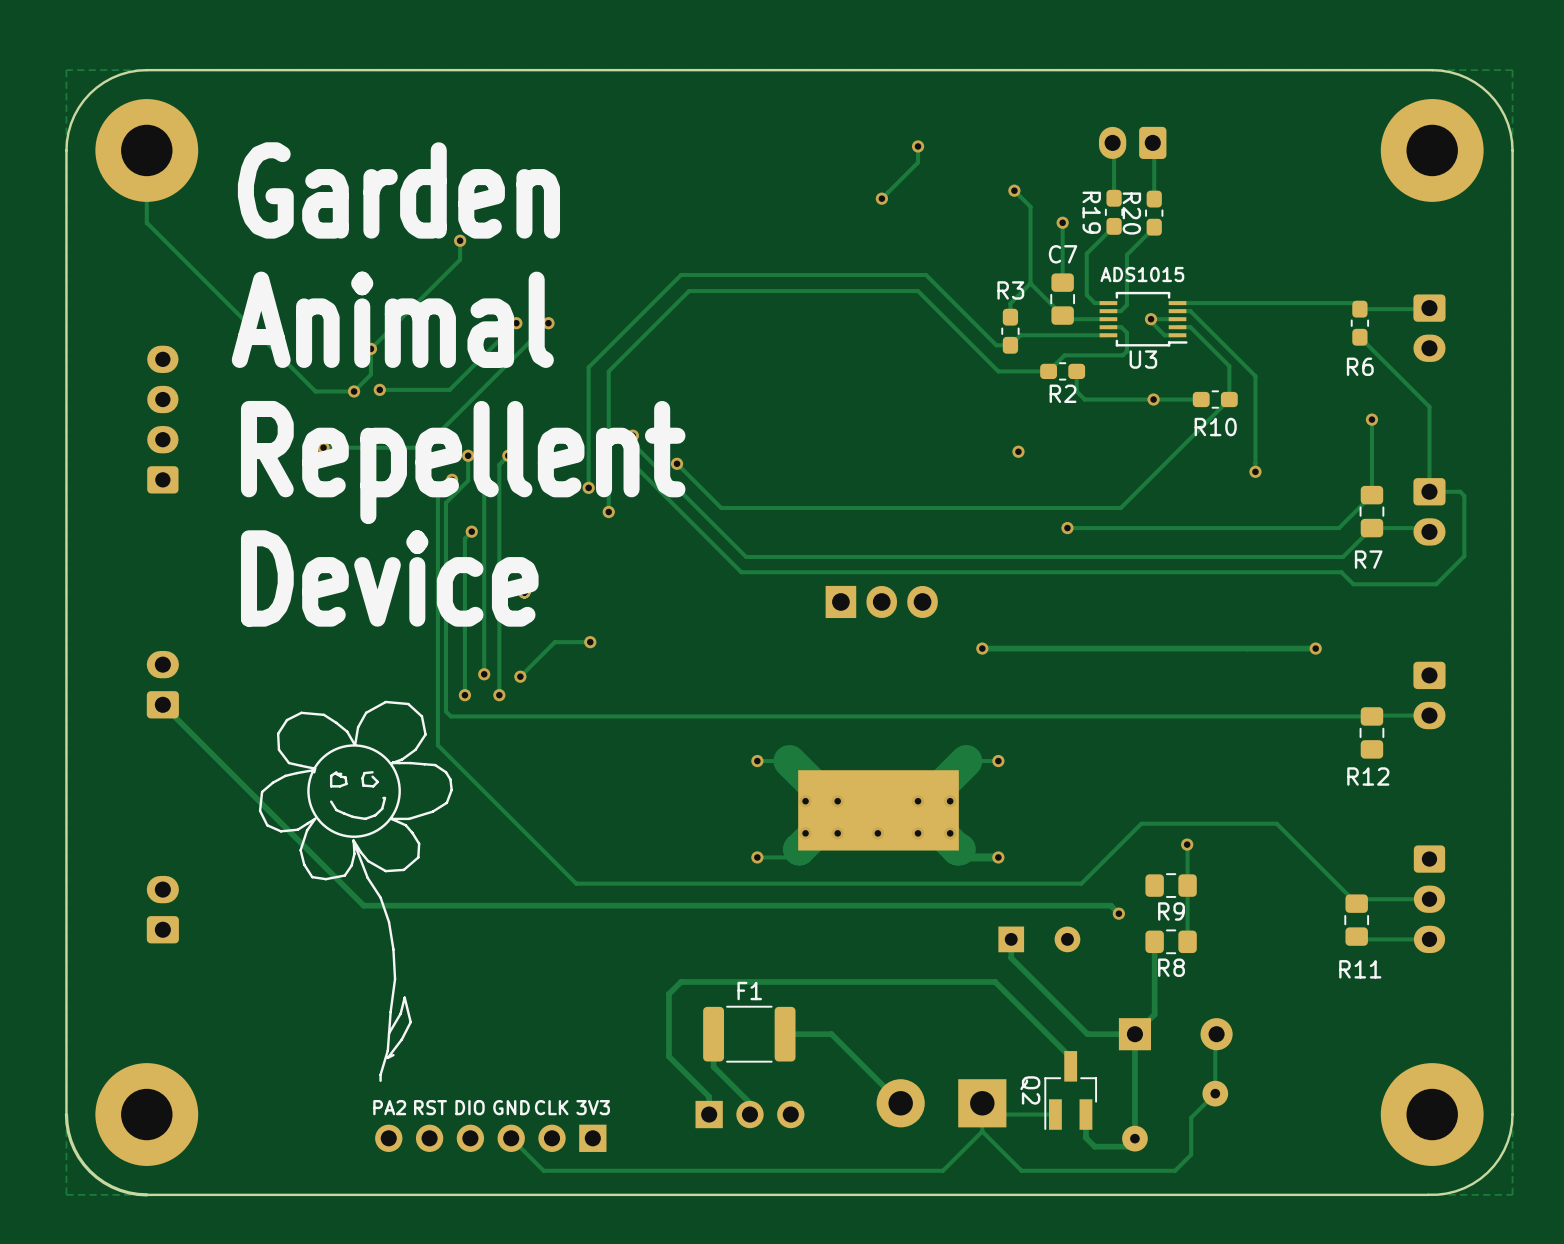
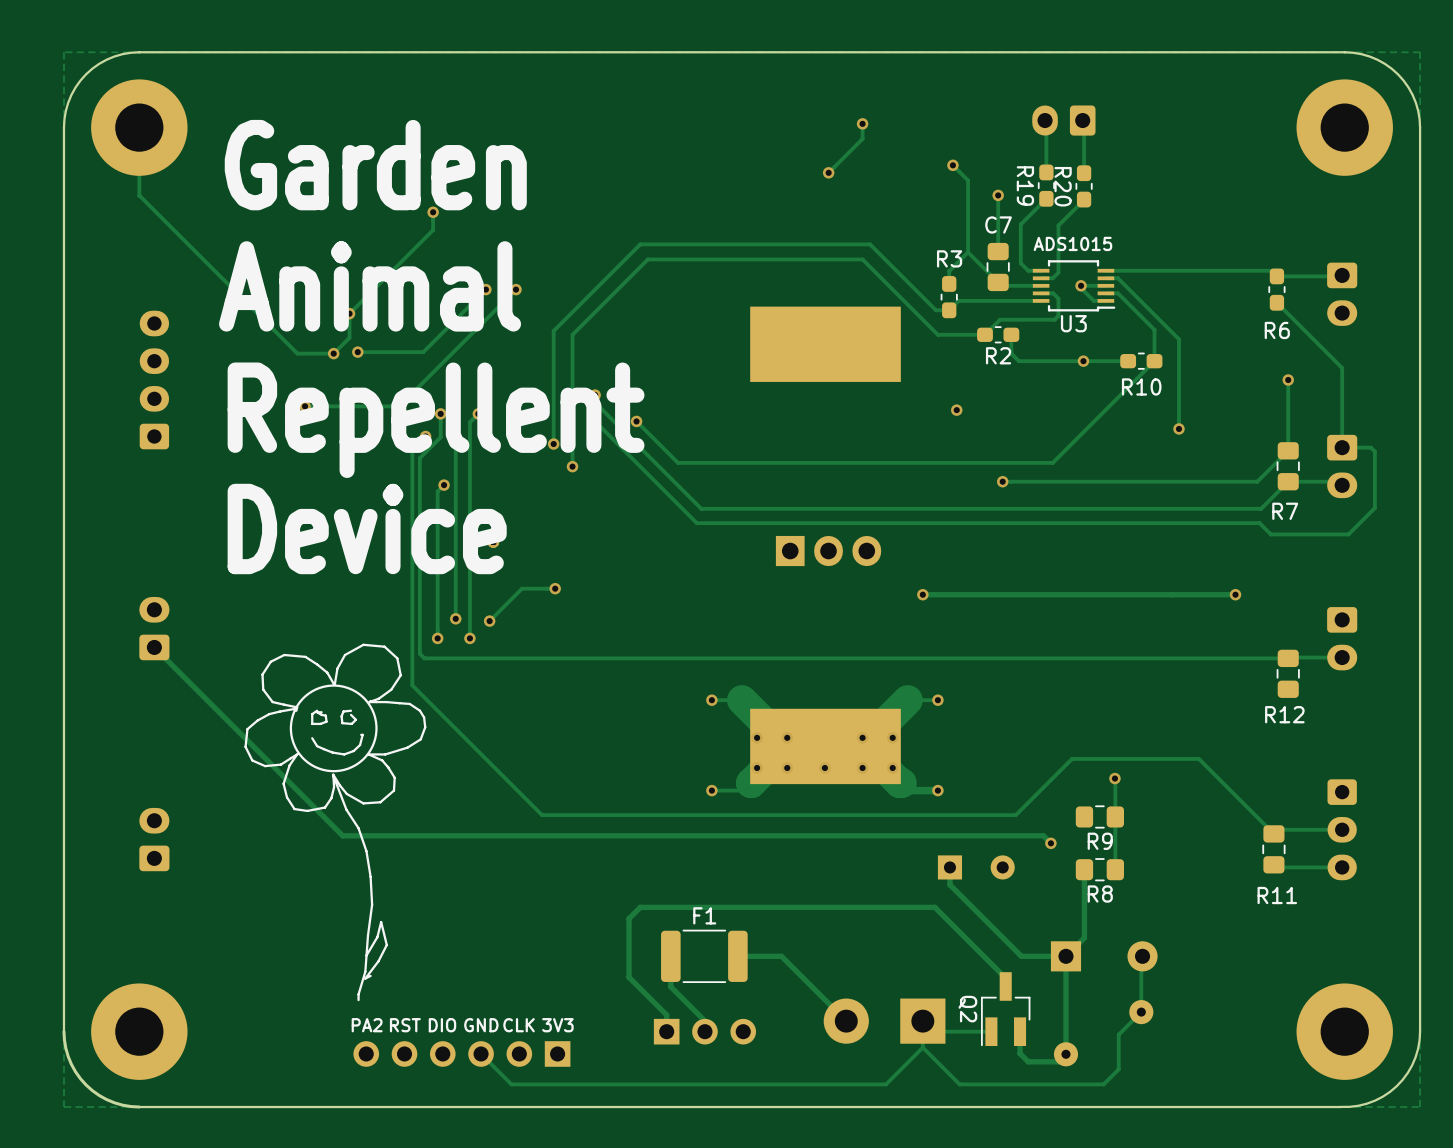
part: none -> (825, 344)

